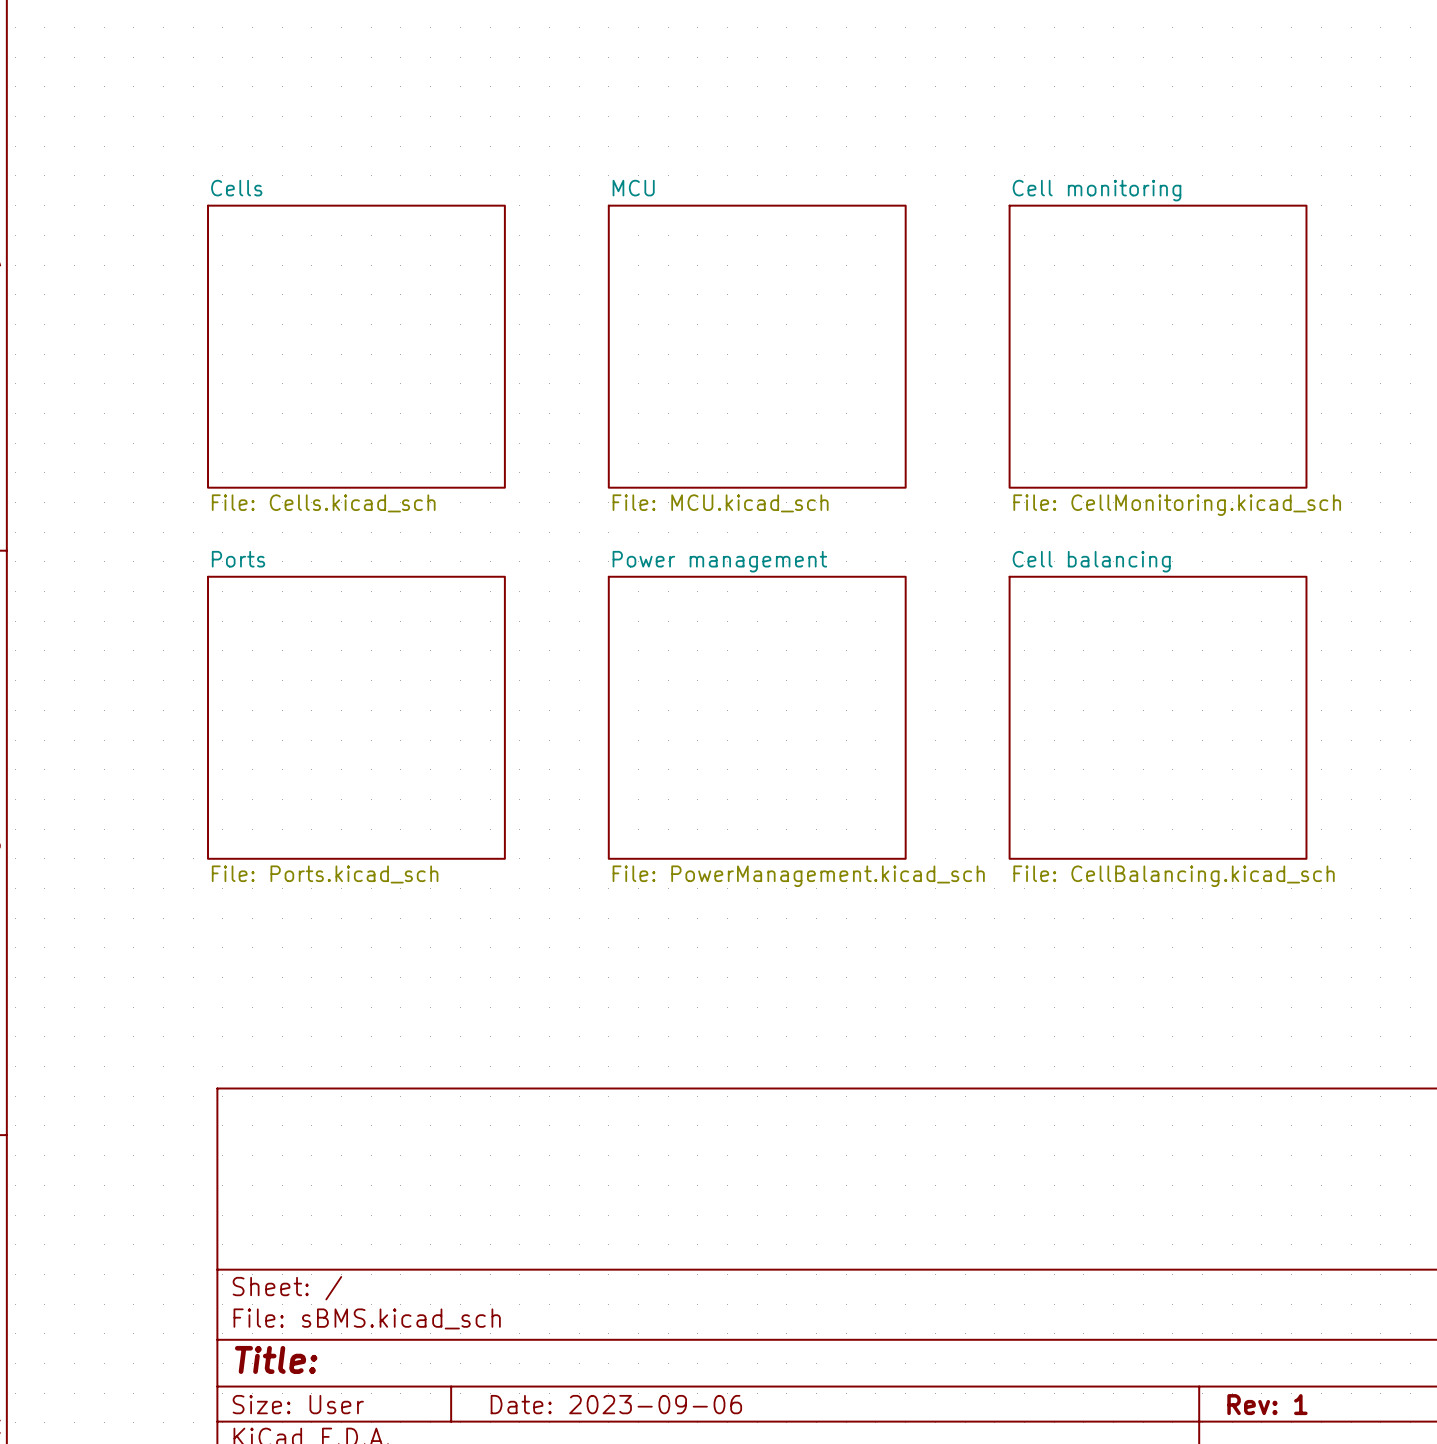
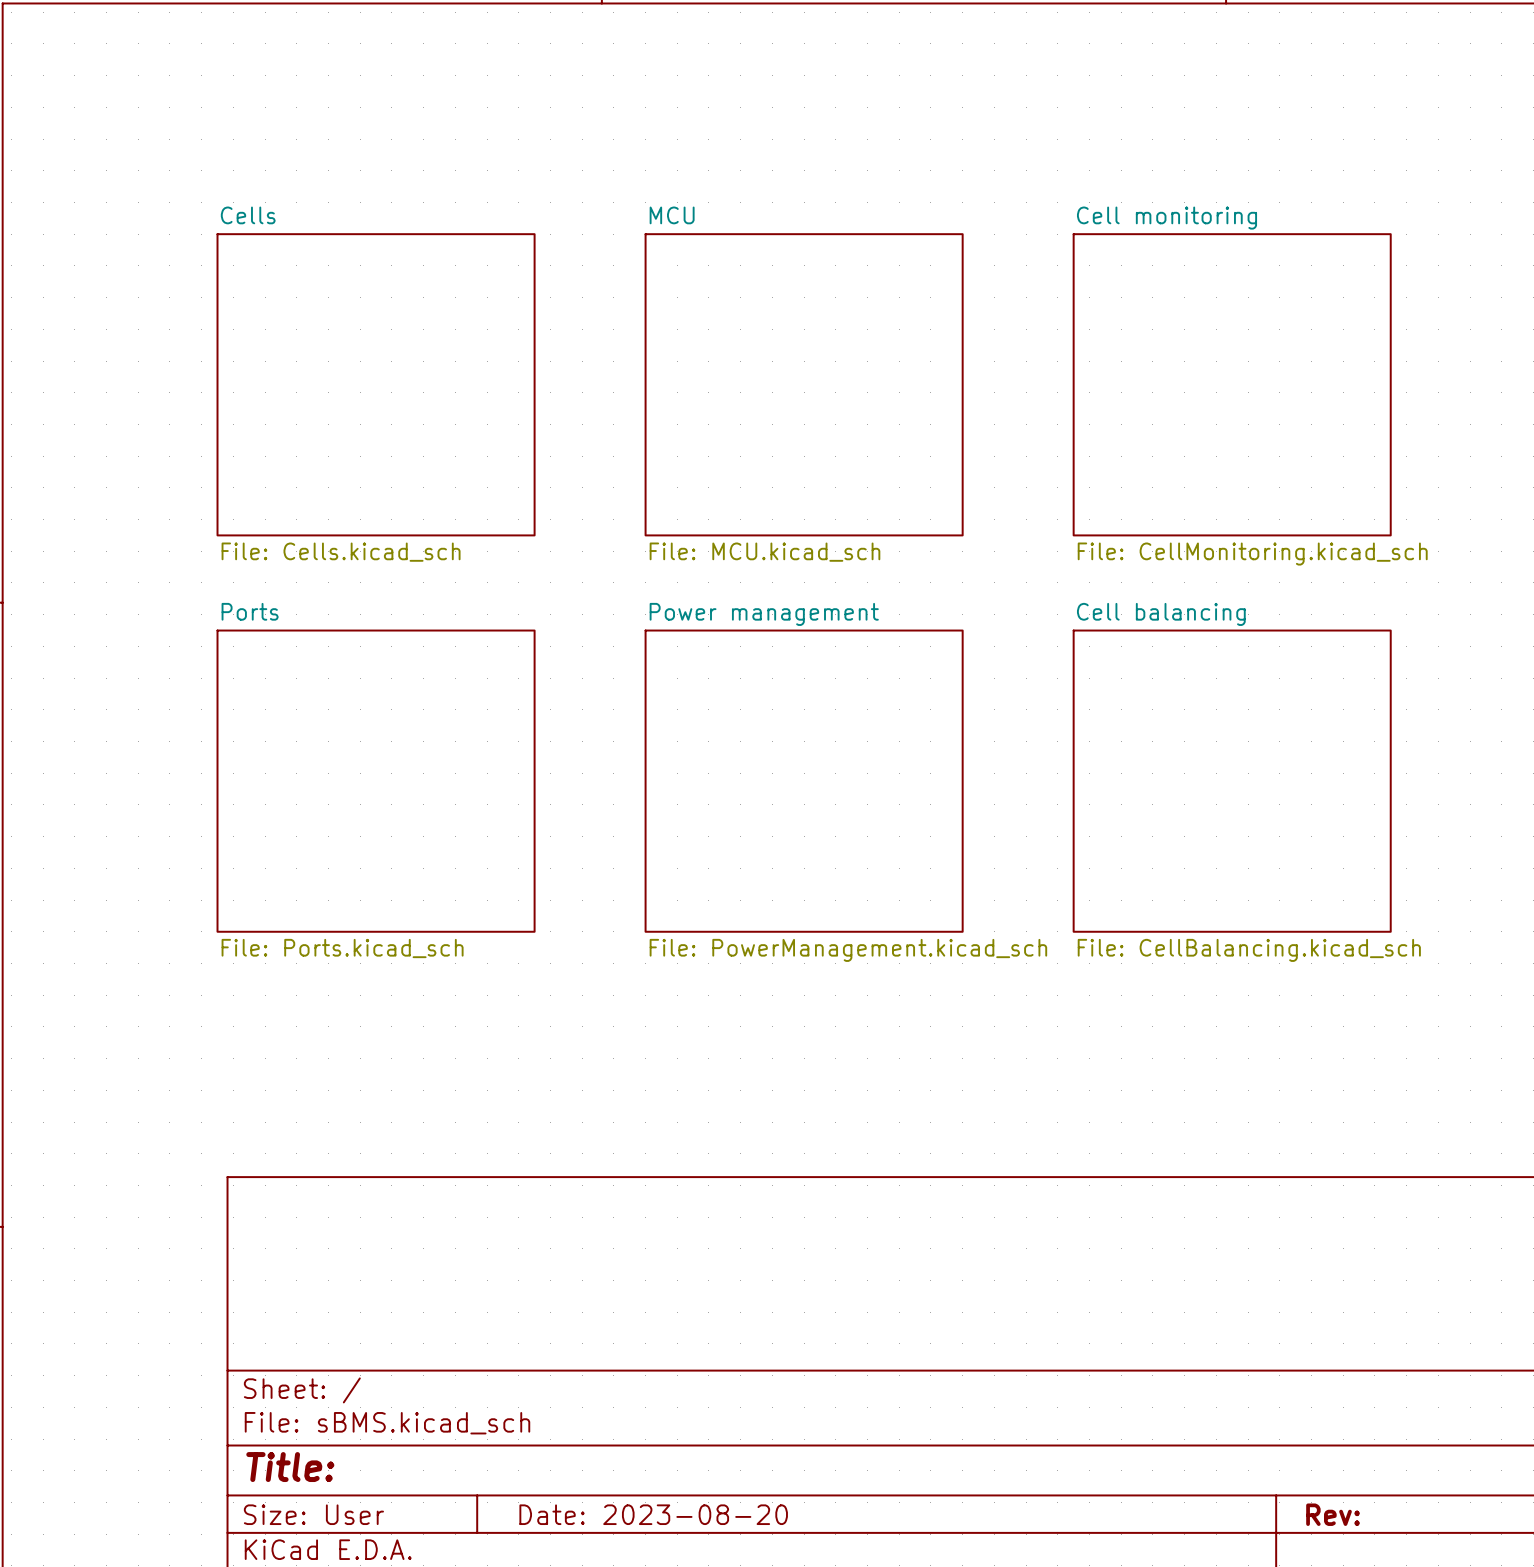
title block: Date: 2023-09-06 (616, 1404) -> Date: 2023-08-20 (653, 1514)
title block: Rev: 1 (1267, 1404) -> Rev: (1333, 1514)

